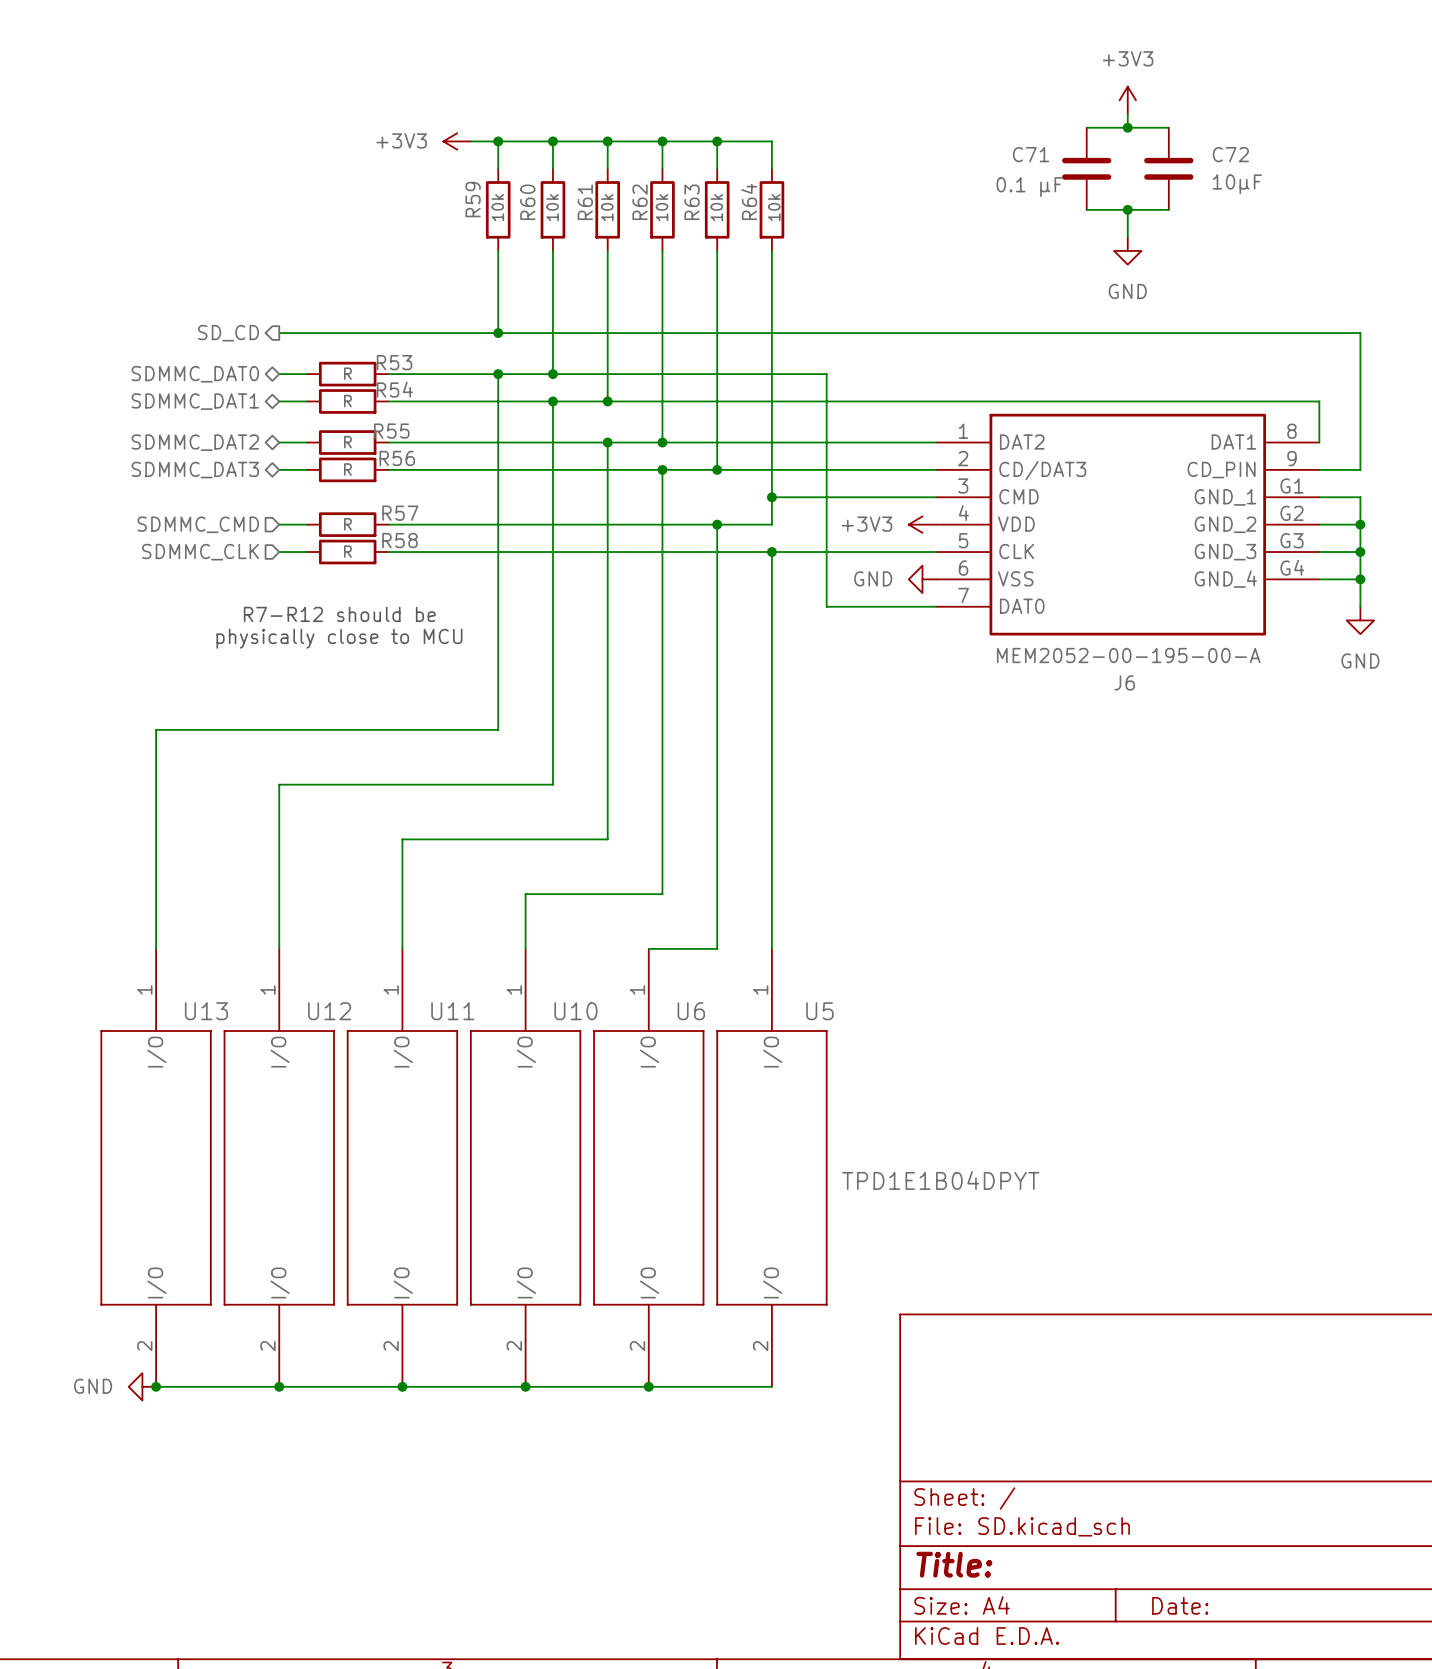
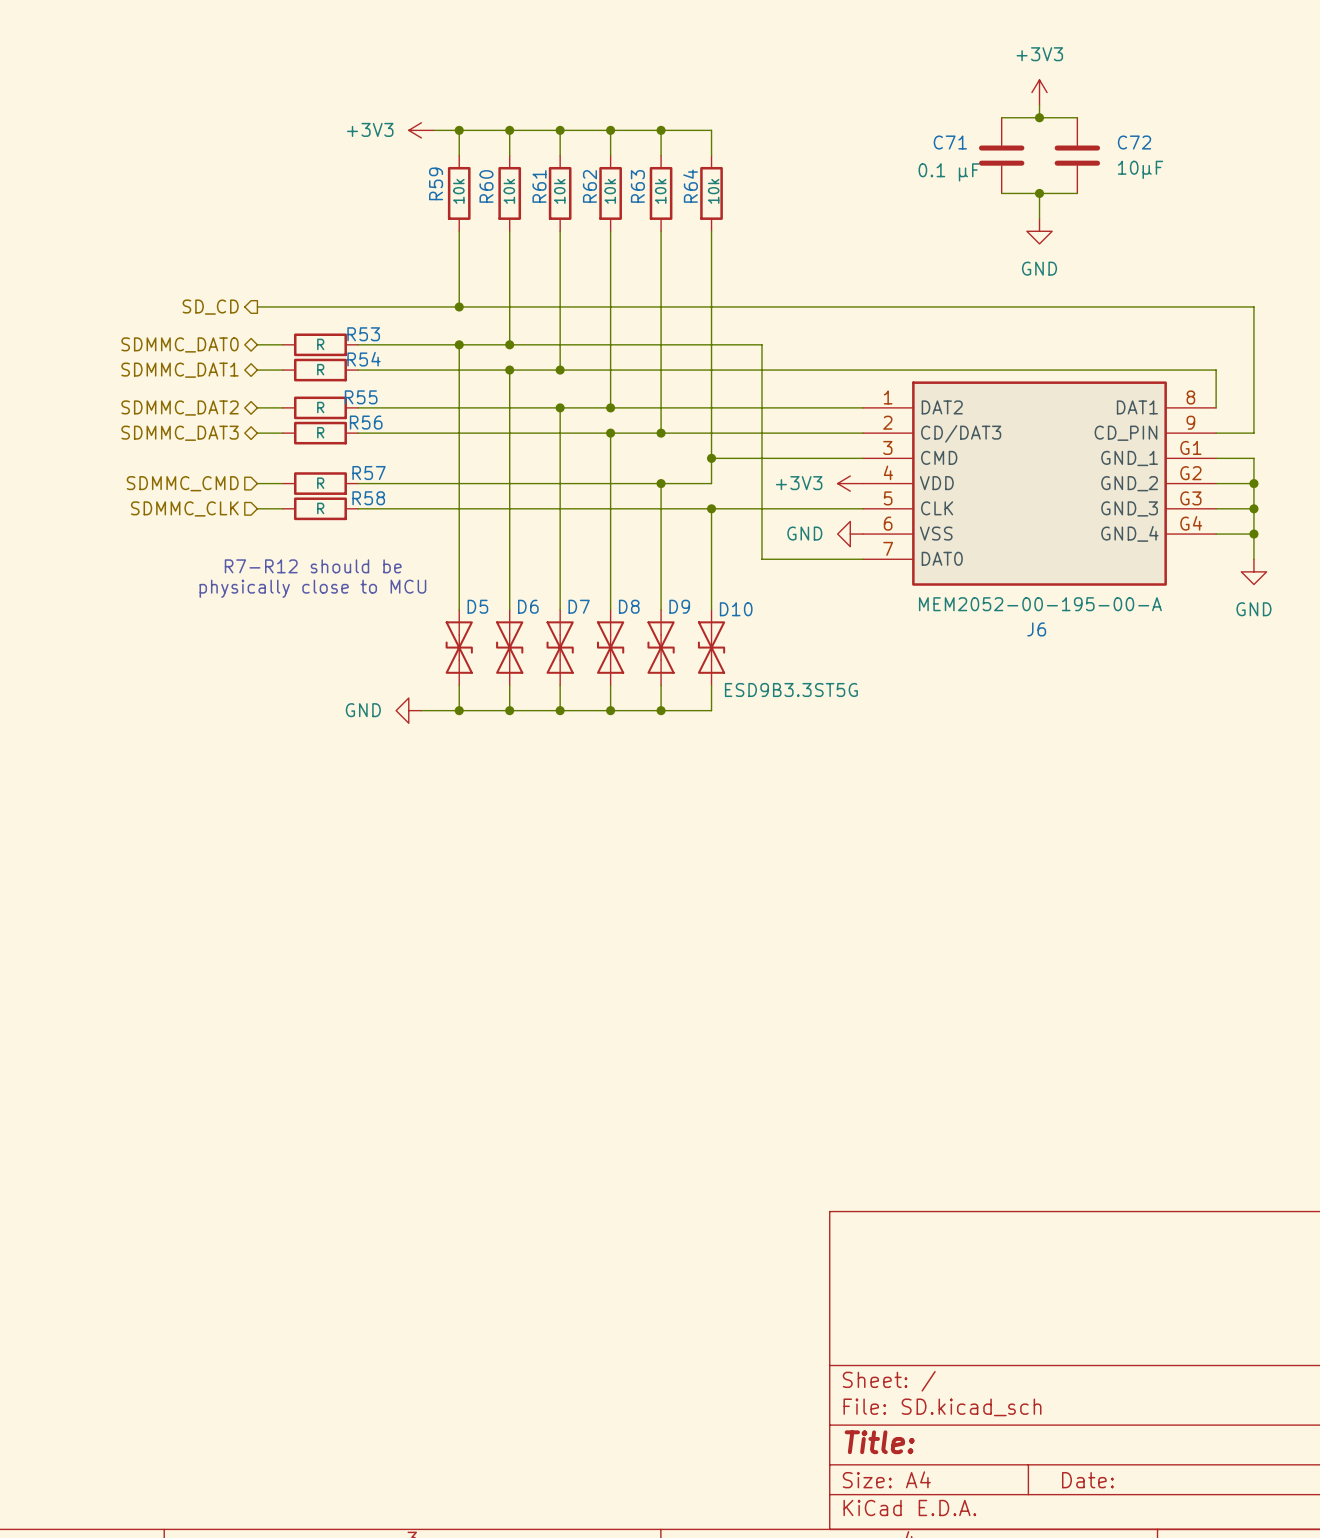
wire: (498, 661) (498, 729) (156, 729) (156, 948) -> none
D5: none -> (459, 647)
D6: none -> (509, 647)
D7: none -> (560, 647)
D8: none -> (610, 647)
D9: none -> (661, 647)
D10: none -> ESD9B3.3ST5G (711, 647)
wire: none -> (459, 685) (459, 710)
power symbol: none -> GND (408, 710)
junction: none -> (459, 710)
wire: (552, 770) (552, 784) (279, 784) (279, 948) -> none
junction: none -> (509, 710)
wire: (607, 770) (607, 839) (402, 839) (402, 948) -> none
junction: none -> (560, 710)
wire: (662, 770) (662, 894) (525, 894) (525, 948) -> none
junction: none -> (610, 710)
wire: (717, 770) (717, 948) (648, 948) -> none
junction: none -> (661, 710)
wire: (771, 770) (771, 948) -> (711, 710) (421, 710)
U13: (156, 1167) -> none
U12: (279, 1167) -> none
U11: (402, 1167) -> none
U10: (525, 1167) -> none
U6: (648, 1167) -> none
U5: TPD1E1B04DPYT (771, 1167) -> none
power symbol: GND (142, 1386) -> none
wire: (156, 1386) (771, 1386) -> none
junction: (156, 1386) -> none
junction: (279, 1386) -> none
junction: (402, 1386) -> none
junction: (525, 1386) -> none
junction: (648, 1386) -> none

